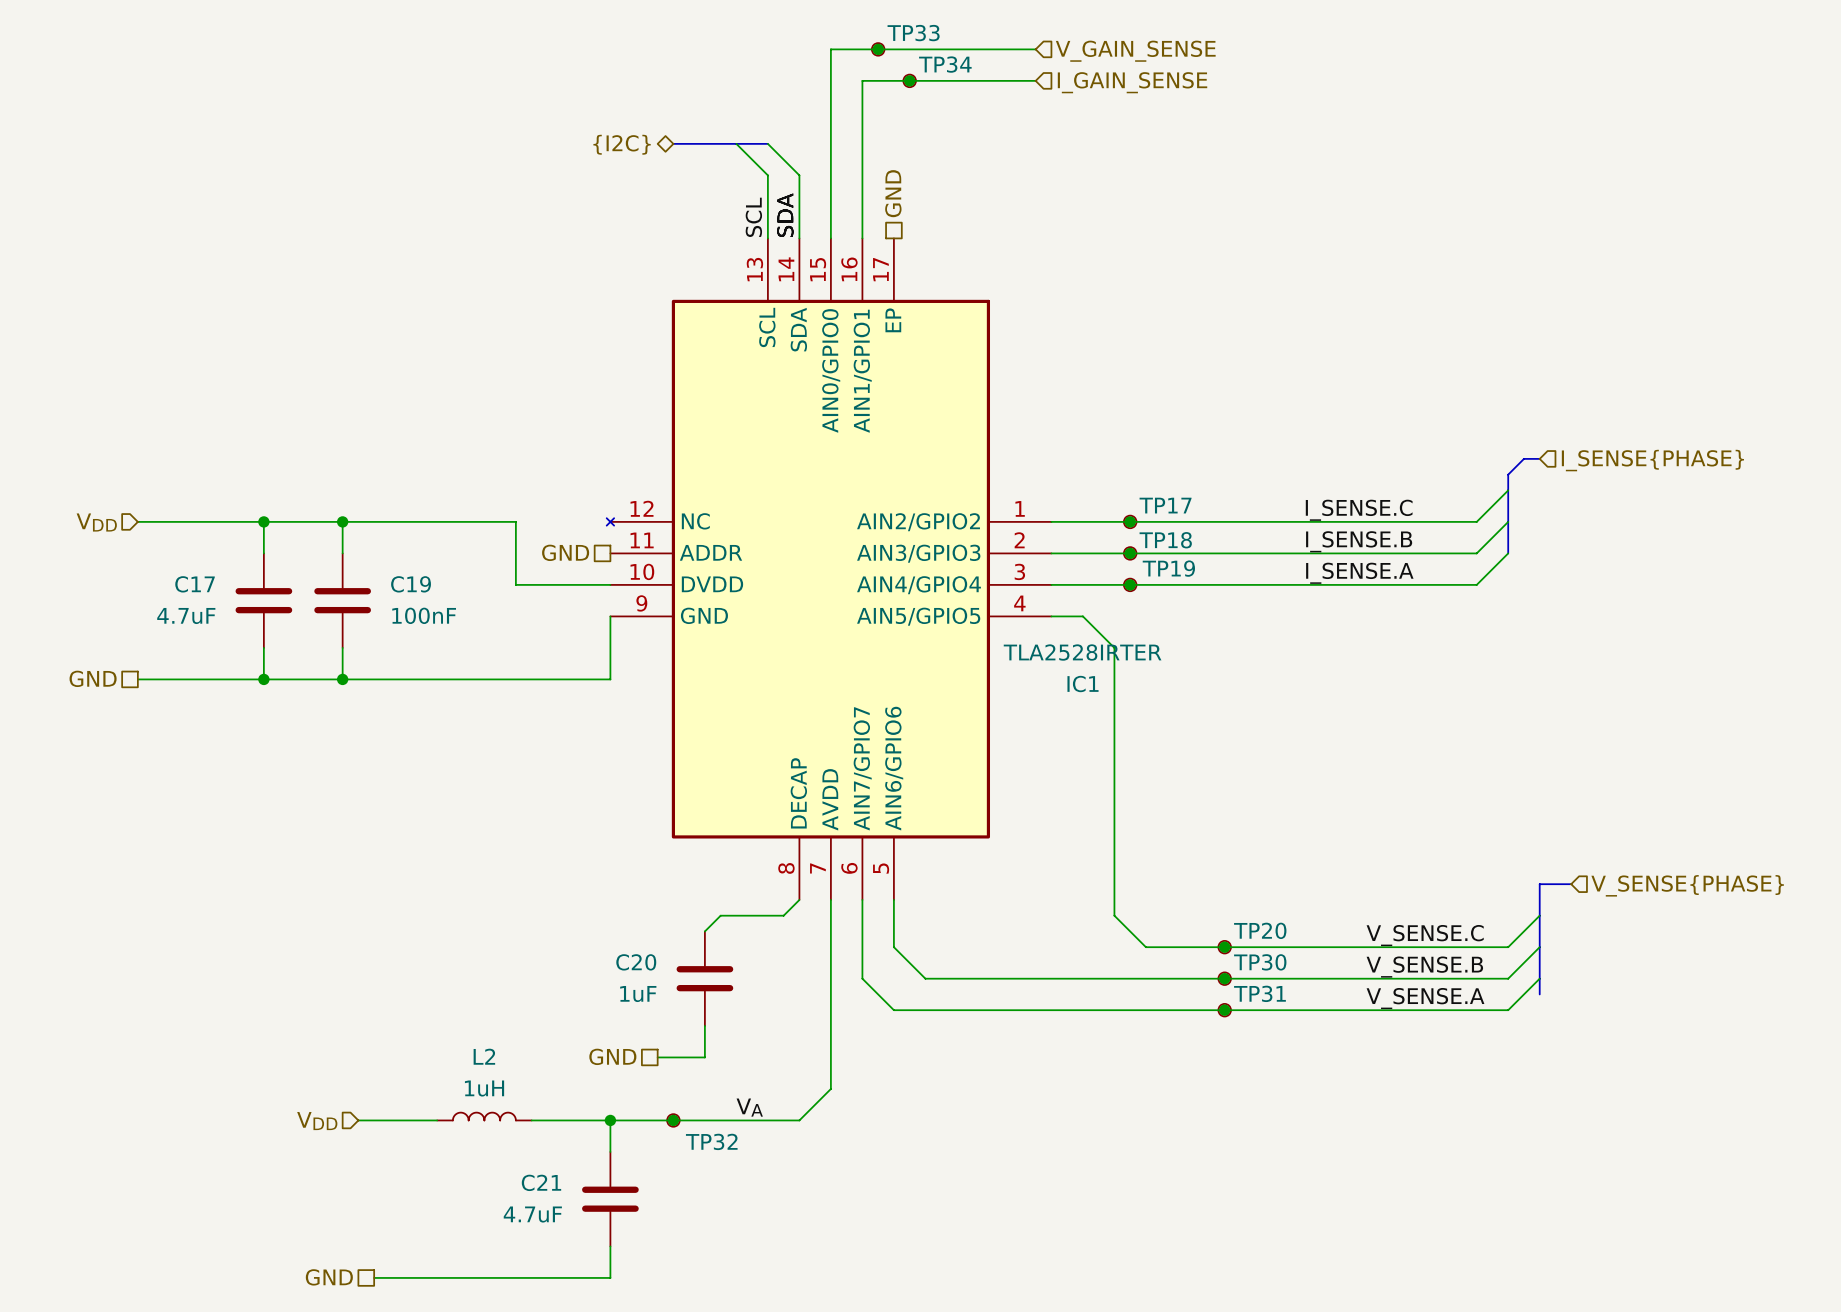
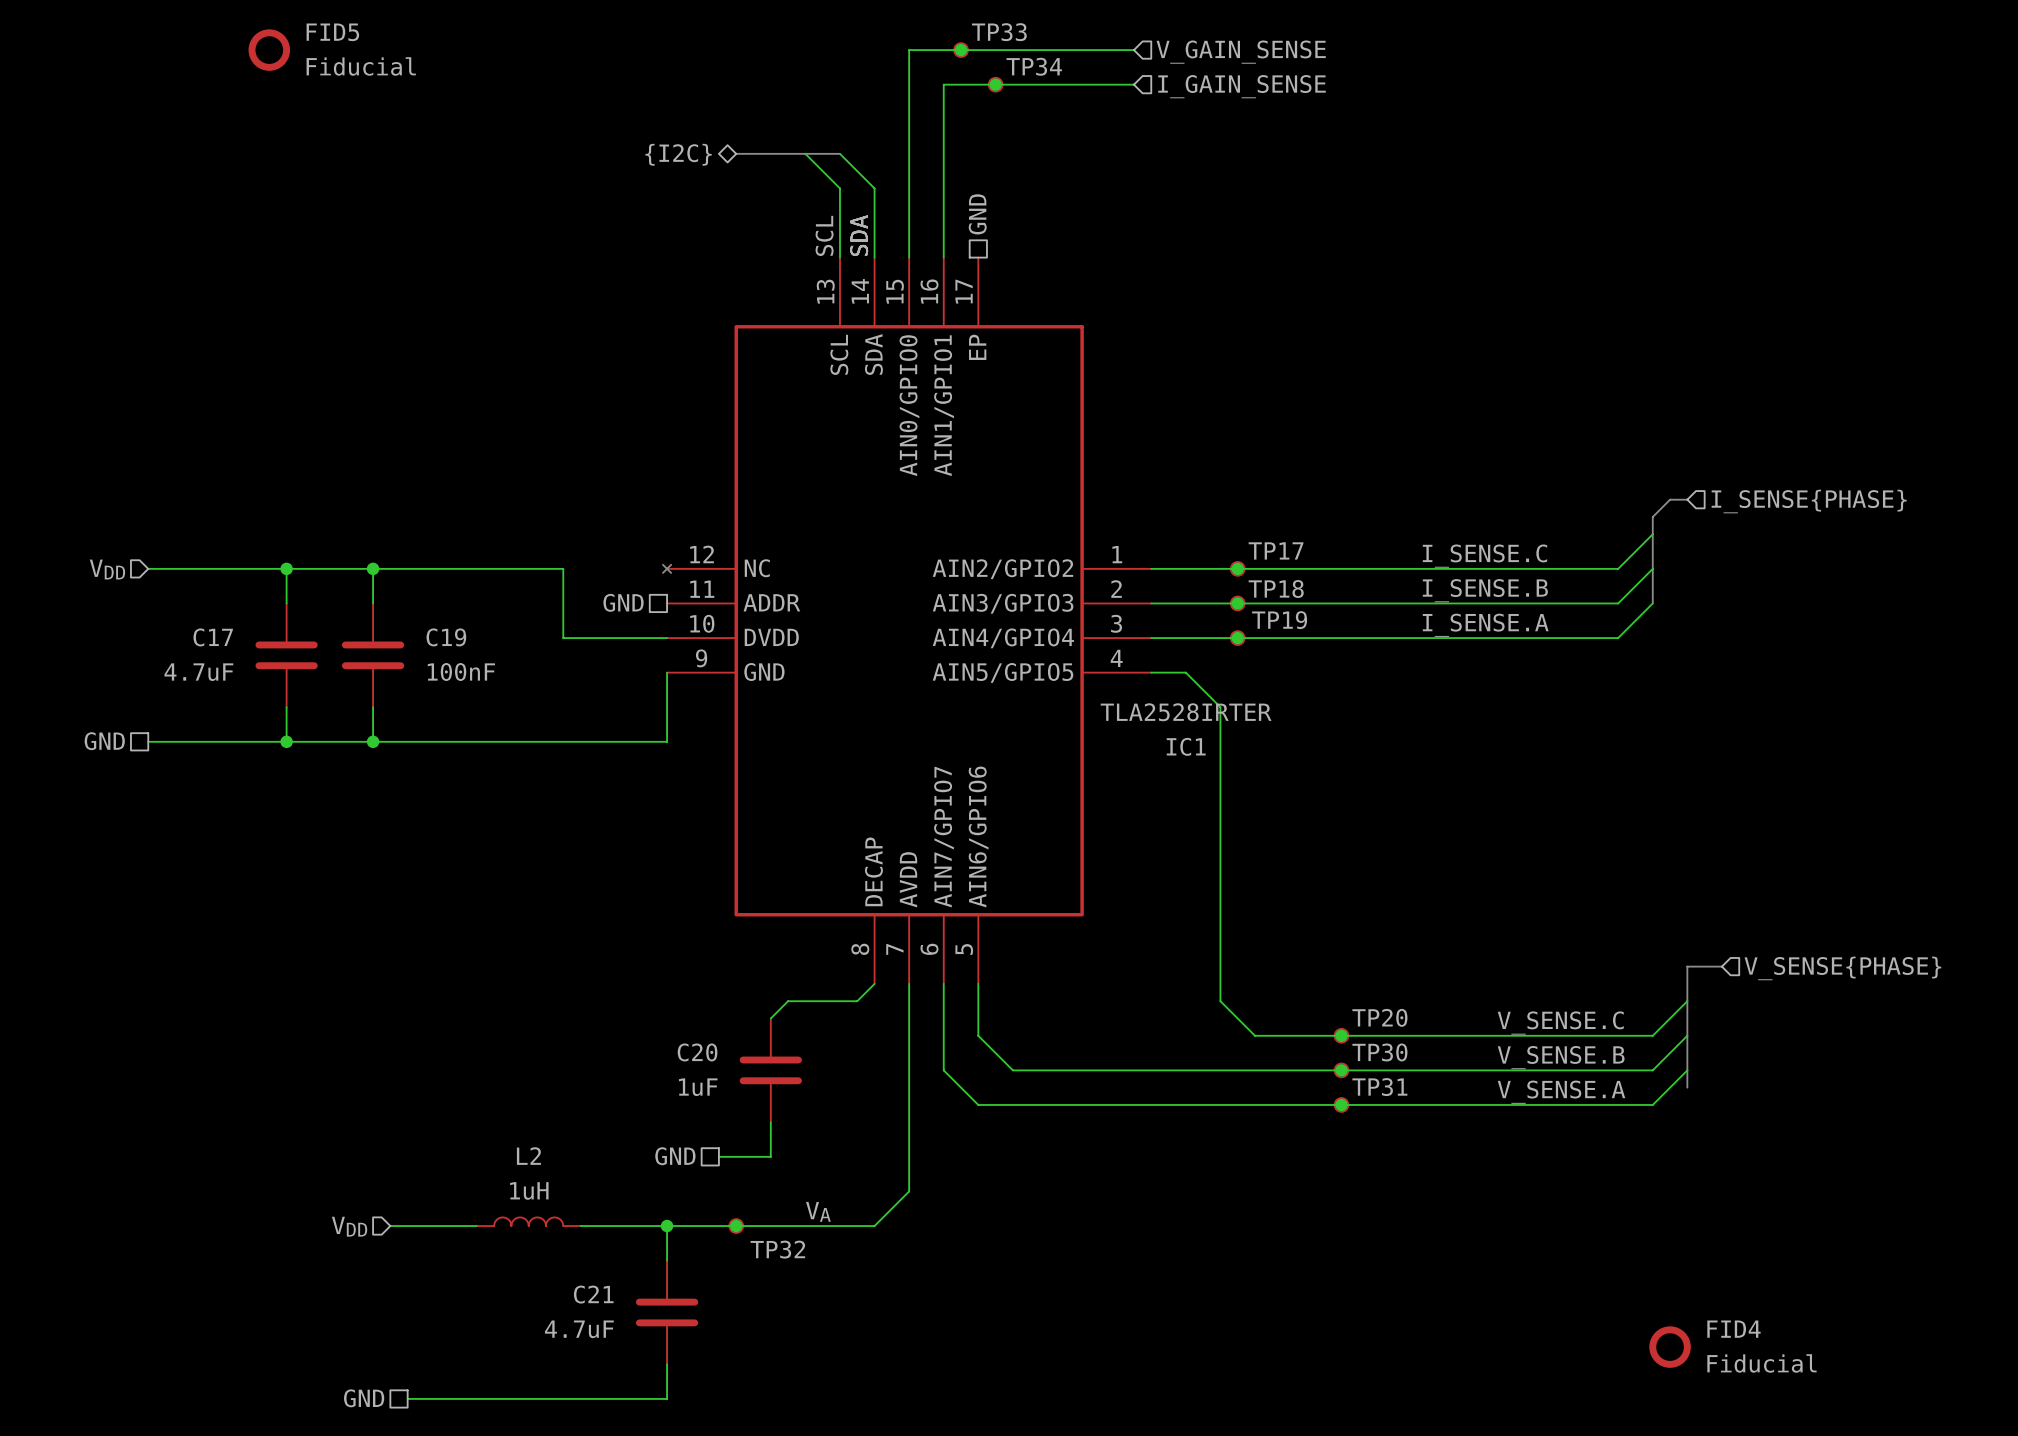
FID5: none -> Fiducial (269, 50)
FID4: none -> Fiducial (1670, 1347)

